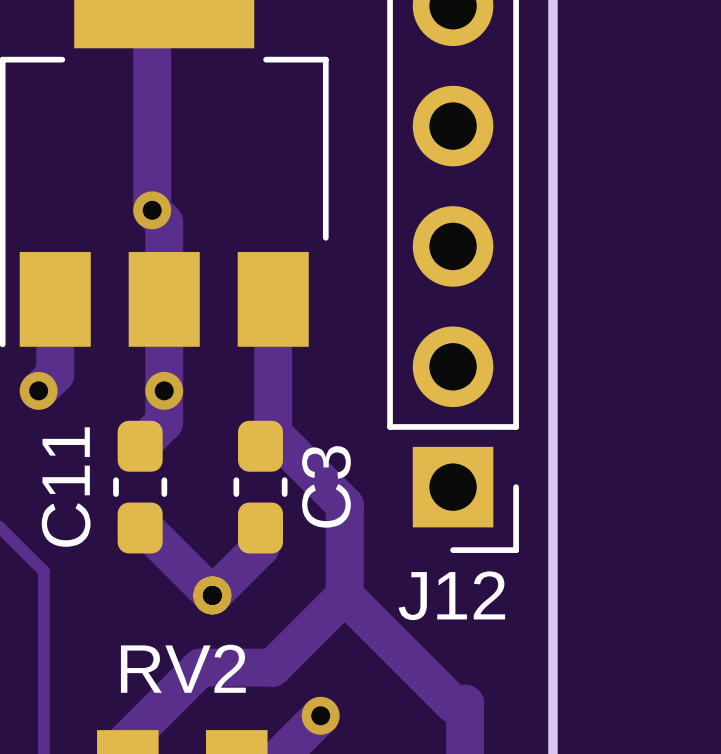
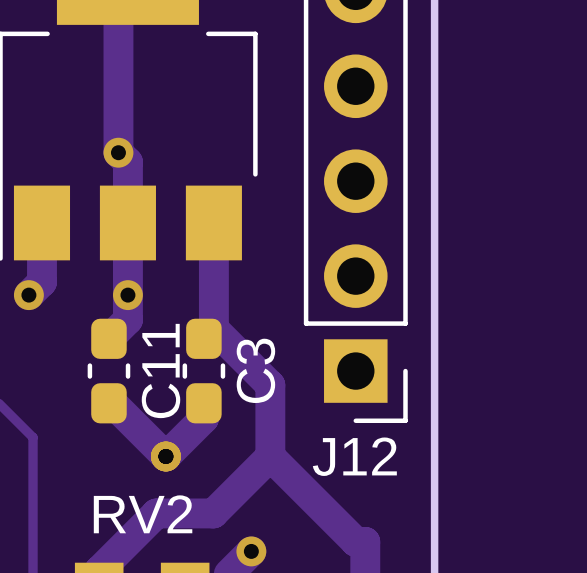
C11 name position: C11 (66, 487) -> C11 (161, 371)

